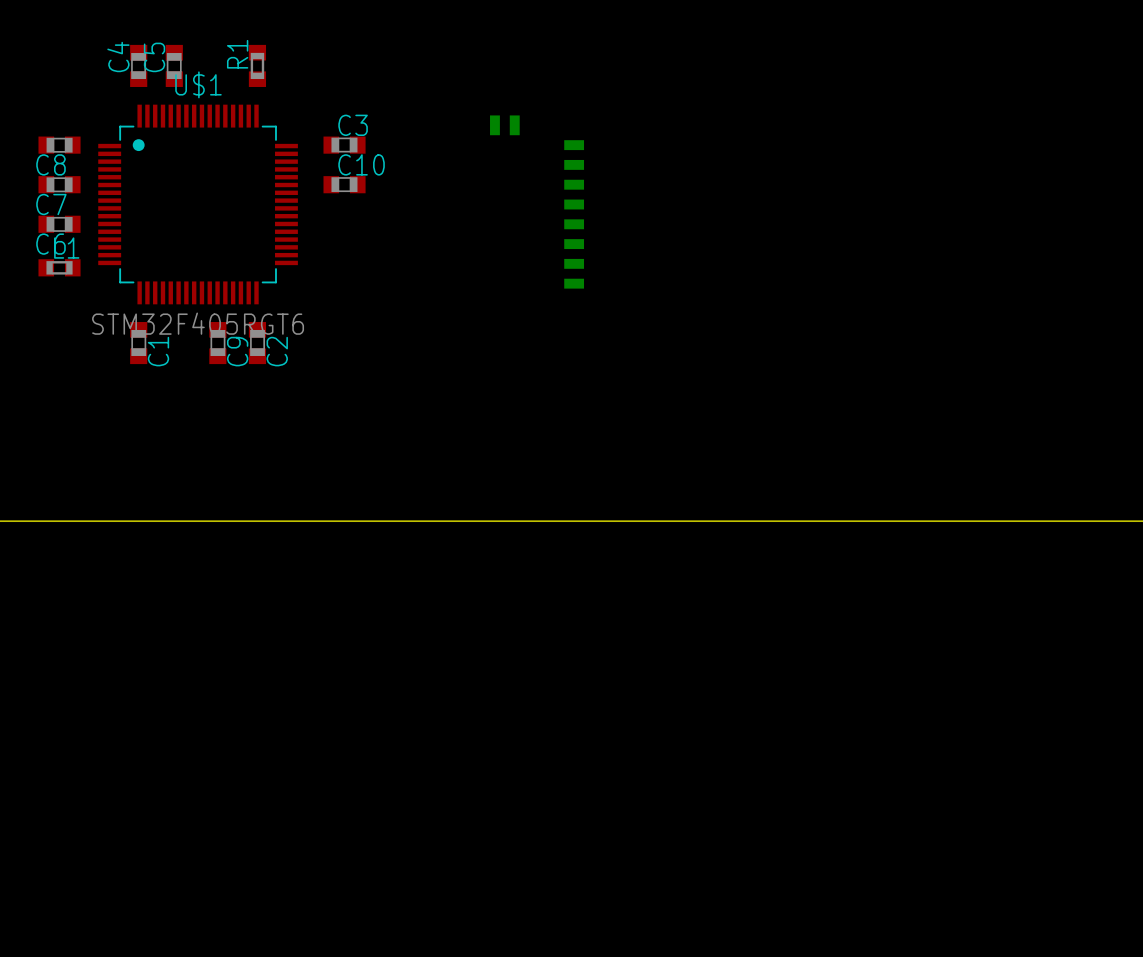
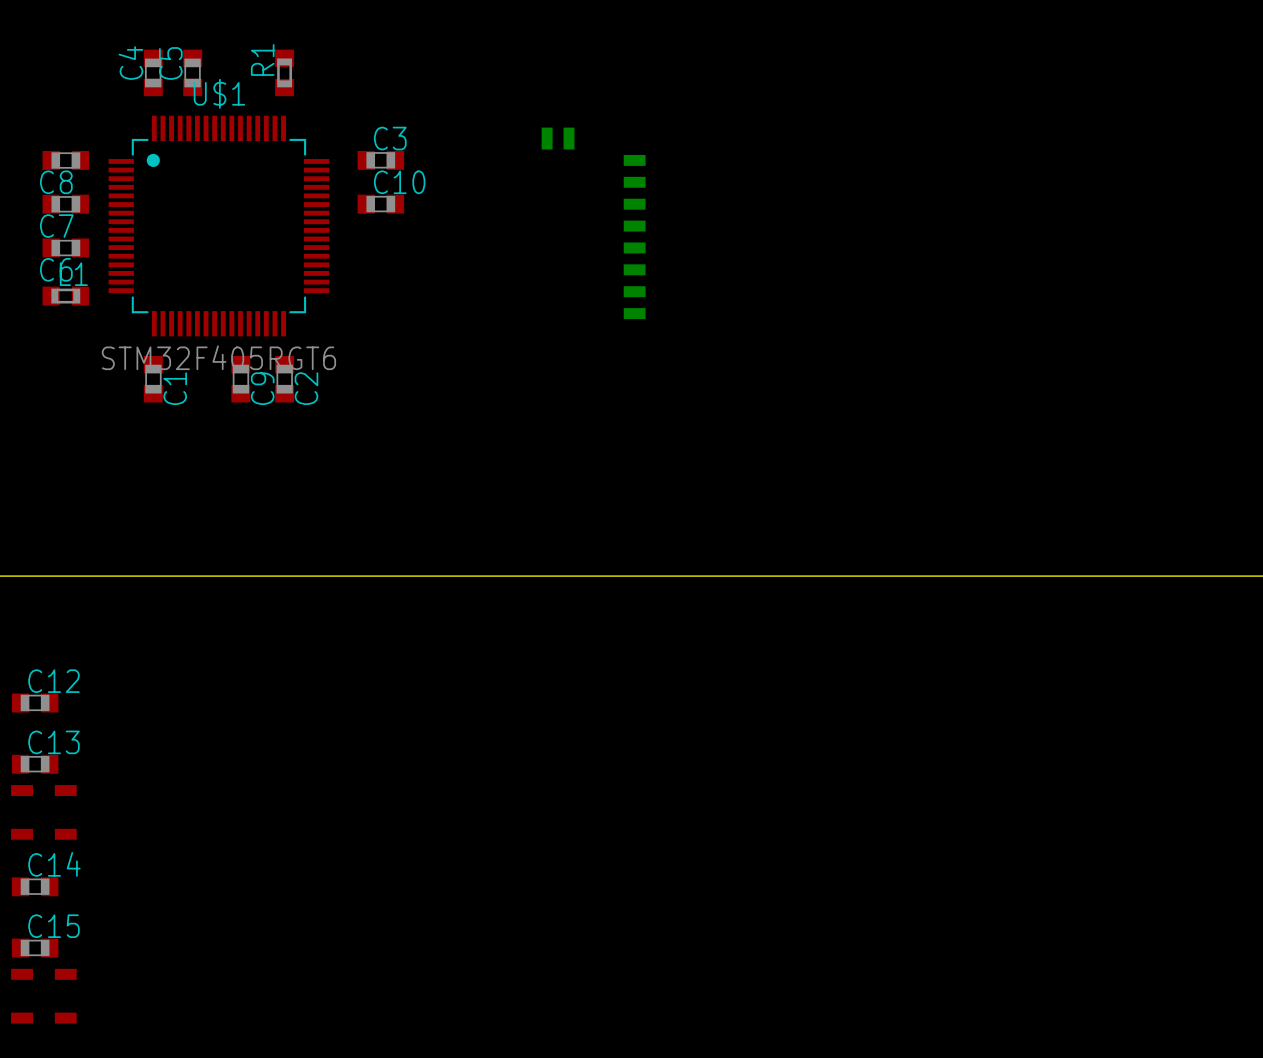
C12: none -> (35, 703)
C13: none -> (35, 764)
part: none -> (43, 812)
C14: none -> (35, 886)
C15: none -> (35, 948)
part: none -> (43, 996)

